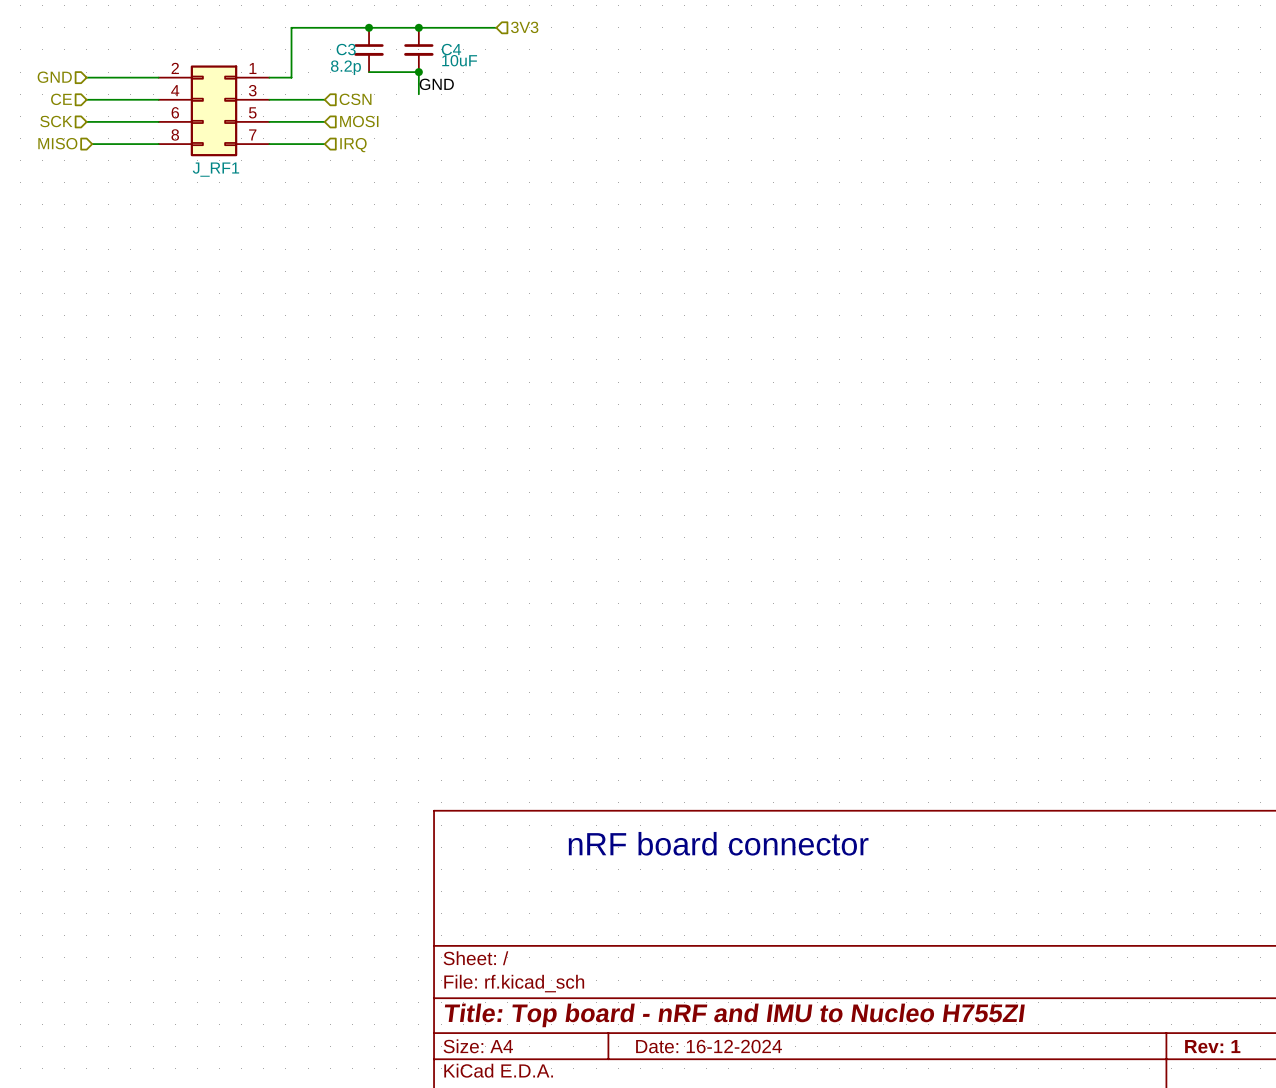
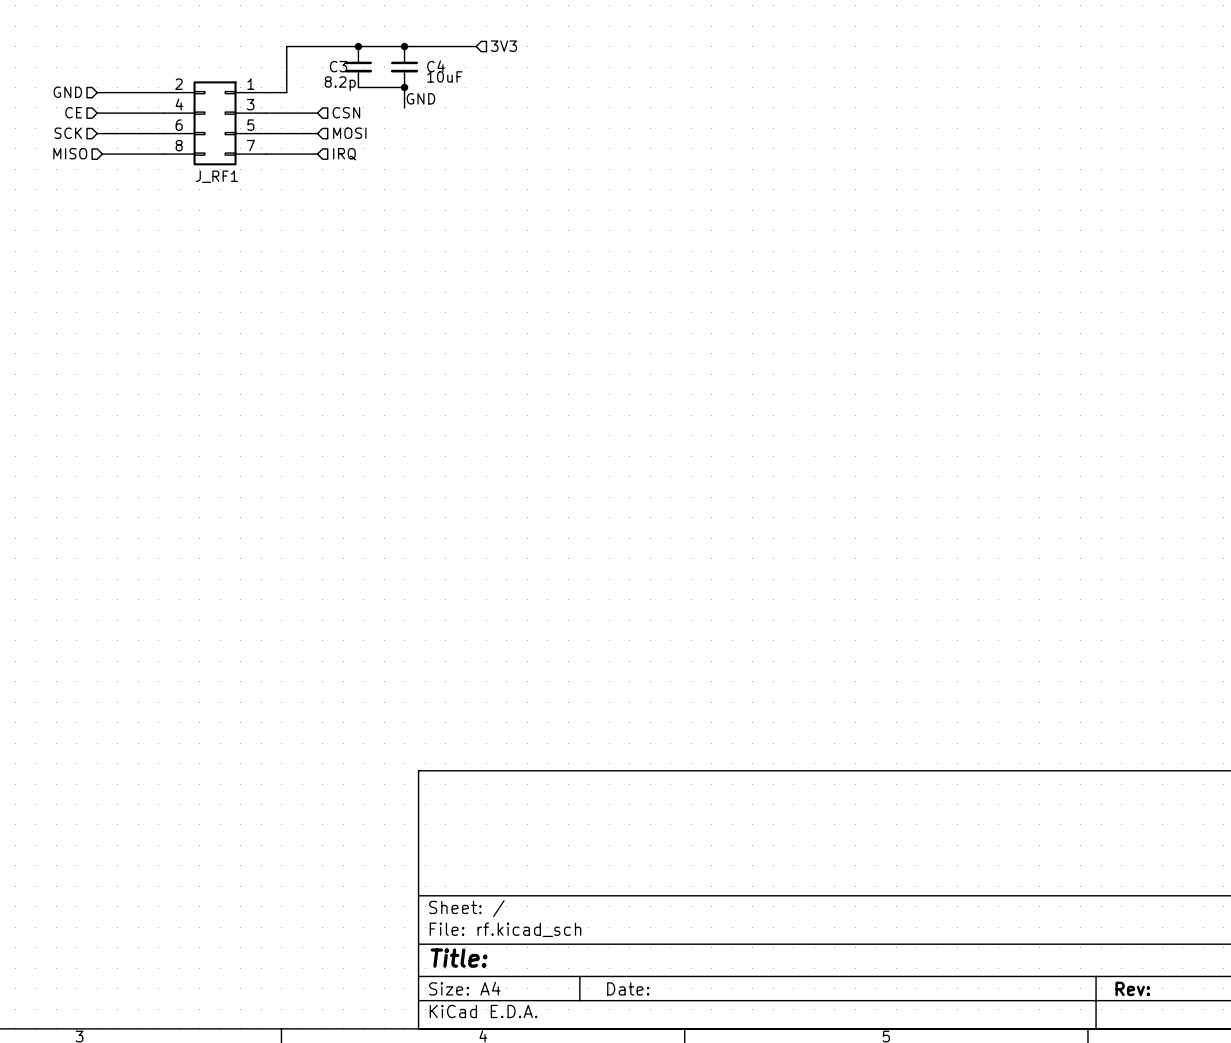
text: nRF board connector (718, 843) -> none
title block: Title: Top board - nRF and IMU to Nucleo H755ZI (734, 1015) -> Title: (459, 958)
title block: Date: 16-12-2024 (709, 1046) -> Date: (628, 988)
title block: Rev: 1 (1212, 1046) -> Rev: (1132, 988)

